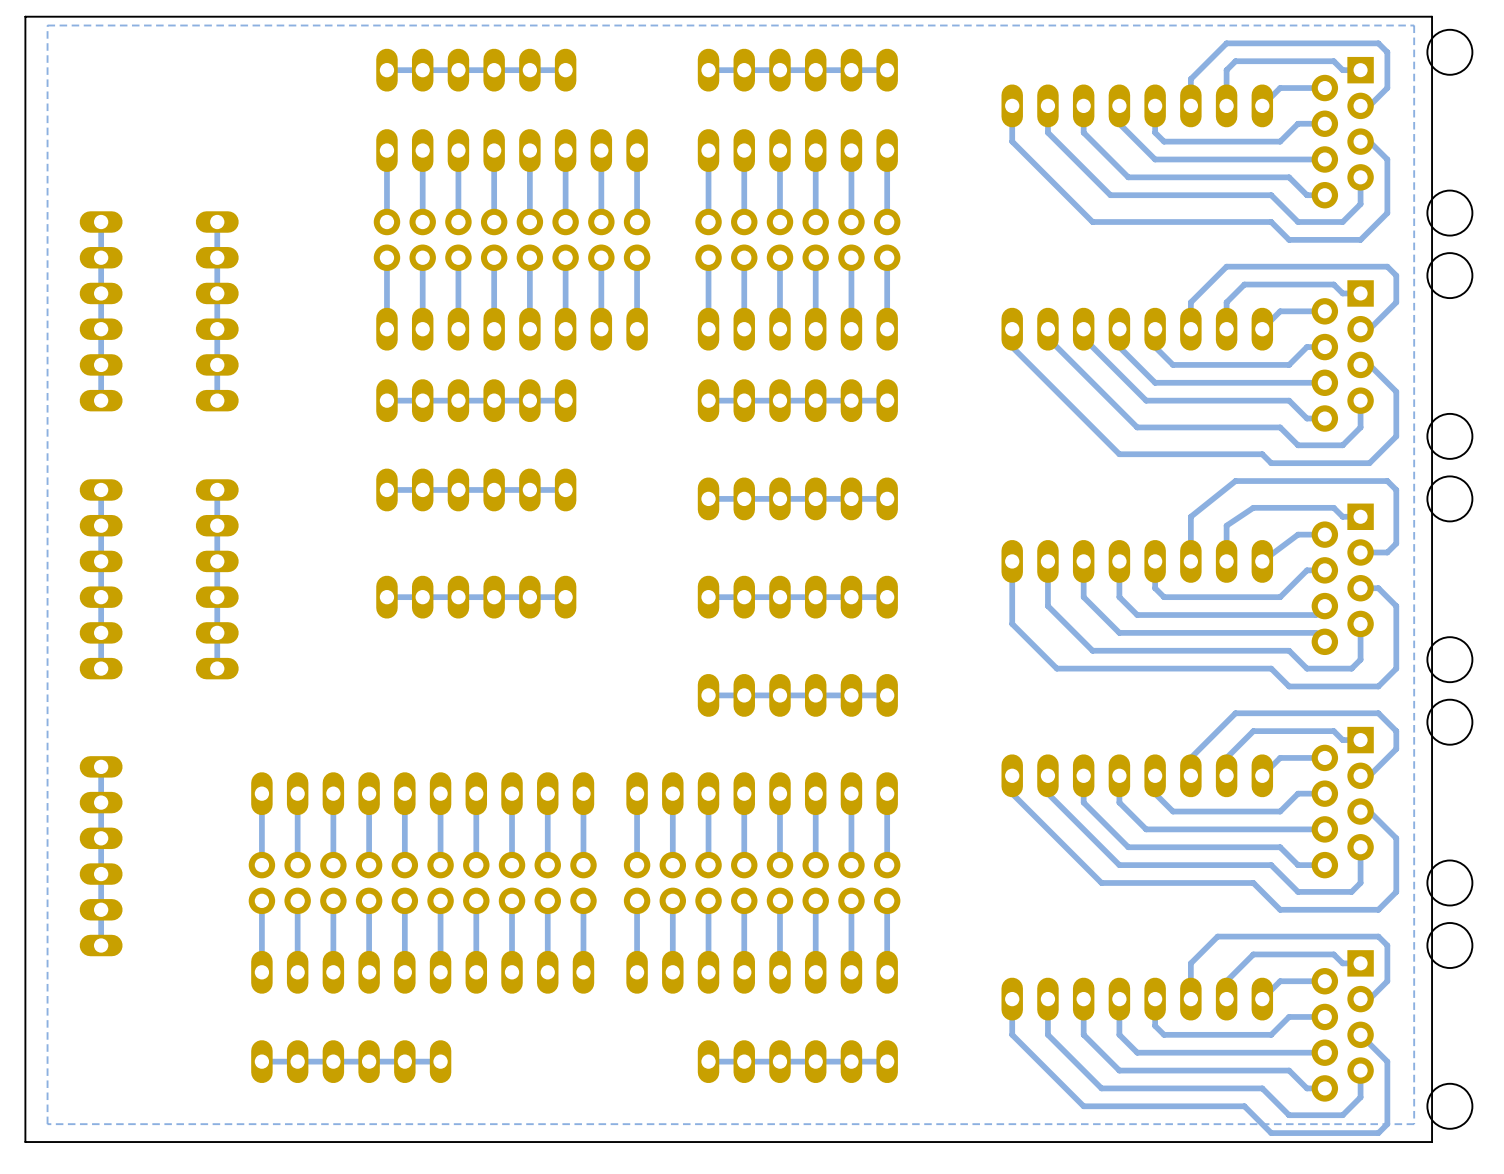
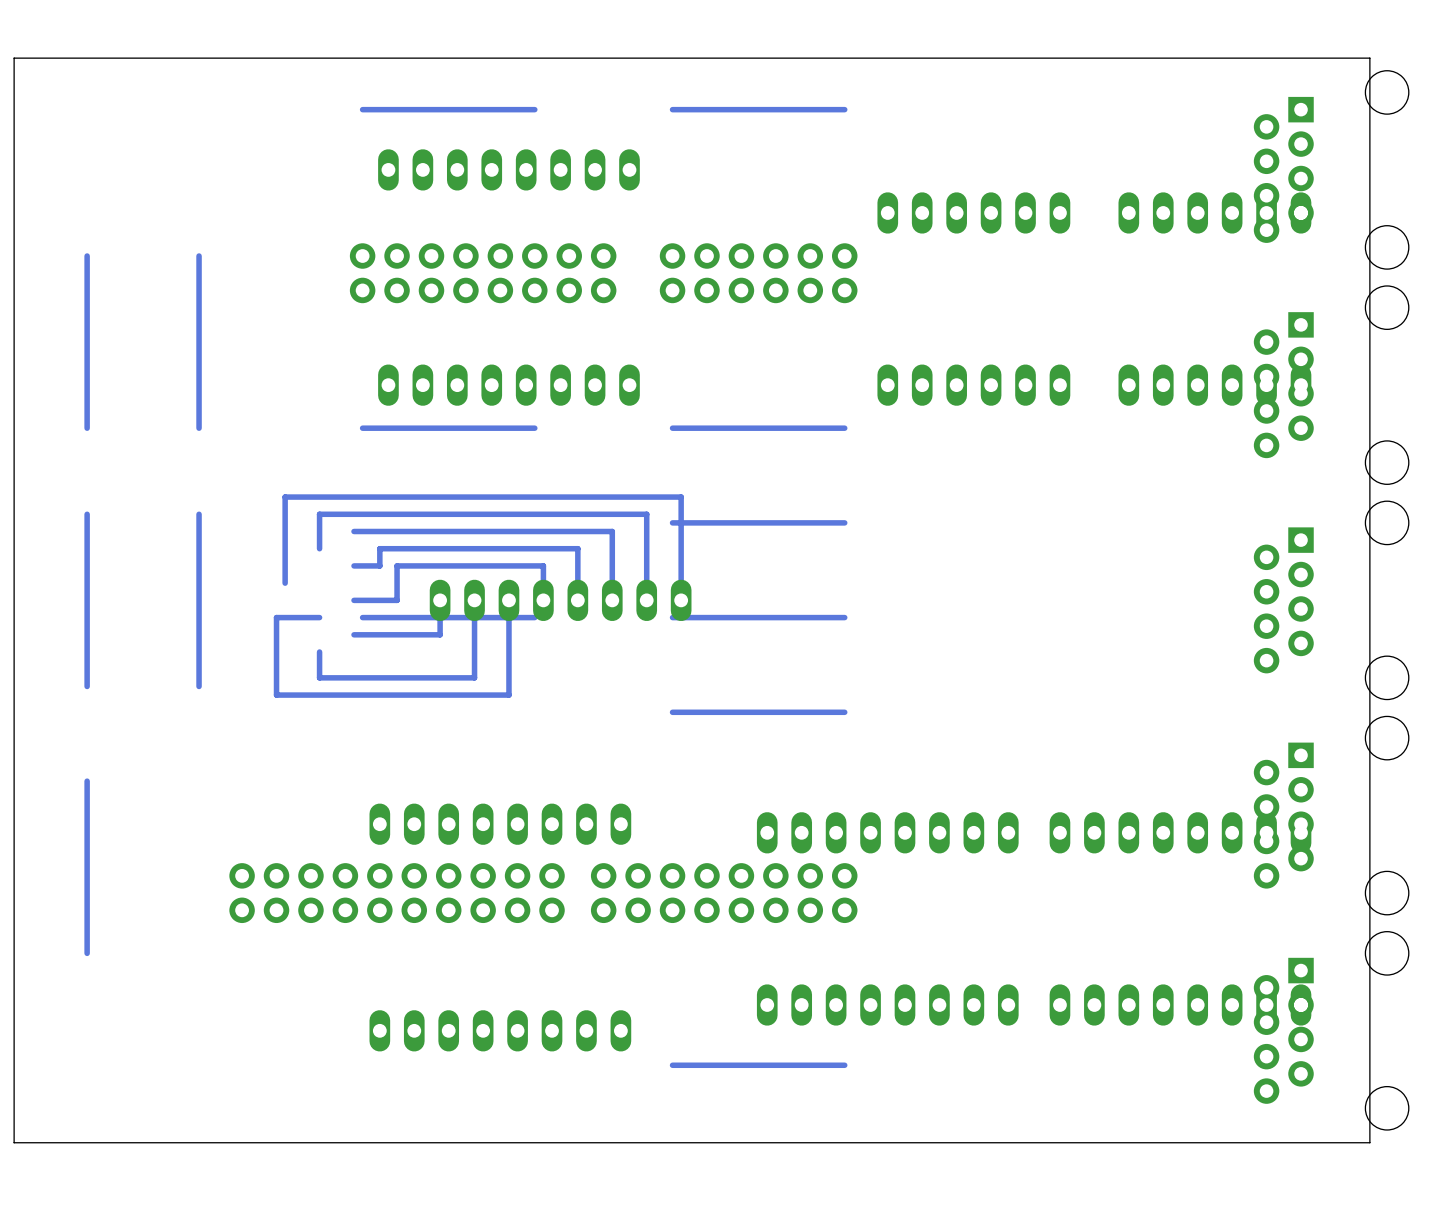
bottom zone outline: (1414, 25) (1414, 1124) (47, 1124) (47, 25) (1414, 25) -> none
part: (476, 70) -> none
part: (797, 70) -> none
bottom track: (1360, 70) (1342, 70) (1333, 61) (1235, 61) (1226, 70) (1226, 105) -> none
bottom track: (1324, 88) (1280, 88) (1262, 105) -> none
bottom track: (1012, 105) (1012, 141) (1092, 222) (1271, 222) (1289, 239) (1360, 239) (1387, 213) (1387, 159) (1369, 141) (1360, 141) -> none
bottom track: (1047, 105) (1047, 132) (1110, 195) (1271, 195) (1298, 222) (1342, 222) (1360, 204) (1360, 177) -> none
bottom track: (1083, 105) (1083, 132) (1128, 177) (1289, 177) (1306, 195) (1324, 195) -> none
bottom track: (1119, 105) (1119, 123) (1155, 159) (1324, 159) -> none
part: (1137, 105) -> none
bottom track: (1155, 105) (1155, 132) (1164, 141) (1280, 141) (1298, 123) (1324, 123) -> none
bottom track: (1360, 105) (1369, 105) (1387, 88) (1387, 52) (1378, 43) (1226, 43) (1190, 79) (1190, 105) -> none
part: none -> (508, 169)
bottom track: (386, 150) (386, 222) -> none
part: (404, 150) -> none
bottom track: (422, 150) (422, 222) -> none
bottom track: (458, 150) (458, 222) -> none
bottom track: (494, 150) (494, 222) -> none
bottom track: (529, 150) (529, 222) -> none
part: (547, 150) -> none
bottom track: (565, 150) (565, 222) -> none
bottom track: (601, 150) (601, 222) -> none
bottom track: (637, 150) (637, 222) -> none
bottom track: (708, 150) (708, 222) -> none
bottom track: (744, 150) (744, 222) -> none
bottom track: (779, 150) (779, 222) -> none
part: (797, 150) -> none
bottom track: (815, 150) (815, 222) -> none
bottom track: (851, 150) (851, 222) -> none
bottom track: (887, 150) (887, 222) -> none
part: none -> (973, 212)
part: none -> (1214, 212)
bottom track: (386, 257) (386, 329) -> none
bottom track: (422, 257) (422, 329) -> none
bottom track: (458, 257) (458, 329) -> none
bottom track: (494, 257) (494, 329) -> none
bottom track: (529, 257) (529, 329) -> none
bottom track: (565, 257) (565, 329) -> none
bottom track: (601, 257) (601, 329) -> none
bottom track: (637, 257) (637, 329) -> none
bottom track: (708, 257) (708, 329) -> none
bottom track: (744, 257) (744, 329) -> none
bottom track: (779, 257) (779, 329) -> none
bottom track: (815, 257) (815, 329) -> none
bottom track: (851, 257) (851, 329) -> none
bottom track: (887, 257) (887, 329) -> none
bottom track: (1360, 293) (1342, 293) (1333, 284) (1244, 284) (1226, 302) (1226, 329) -> none
part: (101, 311) -> none
part: (217, 311) -> none
bottom track: (1324, 311) (1280, 311) (1262, 329) -> none
part: (404, 329) -> none
part: (547, 329) -> none
part: (797, 329) -> none
bottom track: (1012, 329) (1012, 347) (1119, 454) (1262, 454) (1271, 463) (1369, 463) (1396, 436) (1396, 391) (1369, 364) (1360, 364) -> none
bottom track: (1047, 329) (1047, 338) (1137, 427) (1280, 427) (1298, 445) (1342, 445) (1360, 427) (1360, 400) -> none
bottom track: (1083, 329) (1083, 338) (1146, 400) (1289, 400) (1306, 418) (1324, 418) -> none
bottom track: (1119, 329) (1119, 347) (1155, 382) (1324, 382) -> none
part: (1137, 329) -> none
bottom track: (1155, 329) (1155, 347) (1173, 364) (1289, 364) (1306, 347) (1324, 347) -> none
bottom track: (1360, 329) (1369, 329) (1396, 302) (1396, 275) (1387, 266) (1226, 266) (1190, 302) (1190, 329) -> none
part: none -> (508, 385)
part: none -> (973, 385)
part: none -> (1214, 385)
part: (476, 400) -> none
part: (797, 400) -> none
bottom track: none -> (362, 514) (319, 514) (319, 548)
part: (476, 489) -> none
bottom track: none -> (534, 514) (646, 514) (646, 600)
part: (797, 498) -> none
bottom track: none -> (354, 531) (612, 531) (612, 600)
bottom track: (1360, 516) (1342, 516) (1333, 507) (1253, 507) (1226, 525) (1226, 561) -> none
bottom track: (1324, 534) (1298, 534) (1262, 561) -> none
bottom track: none -> (354, 565) (379, 565) (379, 548) (577, 548) (577, 600)
bottom track: (1360, 552) (1387, 552) (1396, 543) (1396, 489) (1387, 481) (1235, 481) (1190, 516) (1190, 561) -> none
bottom track: none -> (285, 583) (285, 497) (681, 497) (681, 600)
bottom track: (1012, 561) (1012, 623) (1056, 668) (1271, 668) (1289, 686) (1378, 686) (1396, 668) (1396, 606) (1378, 588) (1360, 588) -> none
bottom track: (1047, 561) (1047, 606) (1092, 650) (1289, 650) (1306, 668) (1351, 668) (1360, 659) (1360, 623) -> none
bottom track: (1083, 561) (1083, 597) (1119, 632) (1315, 632) (1324, 641) -> none
bottom track: (1119, 561) (1119, 597) (1137, 615) (1315, 615) (1324, 606) -> none
part: (1137, 561) -> none
bottom track: (1155, 561) (1155, 588) (1164, 597) (1280, 597) (1306, 570) (1324, 570) -> none
part: (101, 579) -> none
part: (217, 579) -> none
bottom track: none -> (440, 600) (440, 634) (354, 634)
bottom track: none -> (474, 600) (474, 677) (319, 677) (319, 652)
bottom track: none -> (508, 600) (508, 695) (276, 695) (276, 617) (319, 617)
bottom track: none -> (543, 600) (543, 565) (397, 565) (397, 600) (354, 600)
part: none -> (560, 600)
part: (476, 597) -> none
part: (797, 597) -> none
part: (797, 695) -> none
bottom track: (1360, 740) (1342, 740) (1333, 731) (1253, 731) (1226, 757) (1226, 775) -> none
bottom track: (1324, 757) (1280, 757) (1262, 775) -> none
bottom track: (1012, 775) (1012, 793) (1101, 882) (1253, 882) (1280, 909) (1378, 909) (1396, 891) (1396, 838) (1369, 811) (1360, 811) -> none
bottom track: (1047, 775) (1047, 793) (1119, 865) (1271, 865) (1298, 891) (1351, 891) (1360, 882) (1360, 847) -> none
bottom track: (1083, 775) (1083, 802) (1128, 847) (1280, 847) (1298, 865) (1324, 865) -> none
bottom track: (1119, 775) (1119, 802) (1146, 829) (1324, 829) -> none
part: (1137, 775) -> none
bottom track: (1155, 775) (1155, 793) (1173, 811) (1280, 811) (1298, 793) (1324, 793) -> none
bottom track: (1360, 775) (1369, 775) (1396, 749) (1396, 731) (1378, 713) (1235, 713) (1190, 757) (1190, 775) -> none
bottom track: (261, 793) (261, 865) -> none
part: (279, 793) -> none
bottom track: (297, 793) (297, 865) -> none
bottom track: (333, 793) (333, 865) -> none
bottom track: (369, 793) (369, 865) -> none
bottom track: (404, 793) (404, 865) -> none
bottom track: (440, 793) (440, 865) -> none
part position: (458, 793) -> (500, 824)
bottom track: (476, 793) (476, 865) -> none
bottom track: (512, 793) (512, 865) -> none
bottom track: (547, 793) (547, 865) -> none
bottom track: (583, 793) (583, 865) -> none
bottom track: (637, 793) (637, 865) -> none
bottom track: (672, 793) (672, 865) -> none
bottom track: (708, 793) (708, 865) -> none
bottom track: (744, 793) (744, 865) -> none
part: (762, 793) -> none
bottom track: (779, 793) (779, 865) -> none
bottom track: (815, 793) (815, 865) -> none
bottom track: (851, 793) (851, 865) -> none
bottom track: (887, 793) (887, 865) -> none
part: none -> (887, 832)
part: none -> (1180, 832)
part: (101, 856) -> none
bottom track: (261, 900) (261, 972) -> none
bottom track: (297, 900) (297, 972) -> none
bottom track: (333, 900) (333, 972) -> none
bottom track: (369, 900) (369, 972) -> none
bottom track: (404, 900) (404, 972) -> none
bottom track: (440, 900) (440, 972) -> none
bottom track: (476, 900) (476, 972) -> none
bottom track: (512, 900) (512, 972) -> none
bottom track: (547, 900) (547, 972) -> none
bottom track: (583, 900) (583, 972) -> none
bottom track: (637, 900) (637, 972) -> none
bottom track: (672, 900) (672, 972) -> none
bottom track: (708, 900) (708, 972) -> none
bottom track: (744, 900) (744, 972) -> none
bottom track: (779, 900) (779, 972) -> none
bottom track: (815, 900) (815, 972) -> none
bottom track: (851, 900) (851, 972) -> none
bottom track: (887, 900) (887, 972) -> none
bottom track: (1360, 963) (1342, 963) (1333, 954) (1253, 954) (1226, 981) (1226, 999) -> none
part: (279, 972) -> none
part: (458, 972) -> none
part: (762, 972) -> none
bottom track: (1324, 981) (1280, 981) (1262, 999) -> none
part: none -> (887, 1005)
bottom track: (1012, 999) (1012, 1034) (1083, 1106) (1244, 1106) (1271, 1133) (1378, 1133) (1387, 1124) (1387, 1061) (1360, 1034) -> none
bottom track: (1047, 999) (1047, 1034) (1101, 1088) (1262, 1088) (1289, 1115) (1342, 1115) (1360, 1097) (1360, 1070) -> none
bottom track: (1083, 999) (1083, 1034) (1119, 1070) (1289, 1070) (1306, 1088) (1324, 1088) -> none
bottom track: (1119, 999) (1119, 1034) (1137, 1052) (1324, 1052) -> none
part position: (1137, 999) -> (1180, 1005)
bottom track: (1155, 999) (1155, 1025) (1164, 1034) (1271, 1034) (1289, 1016) (1324, 1016) -> none
bottom track: (1360, 999) (1369, 999) (1387, 981) (1387, 945) (1378, 936) (1217, 936) (1190, 963) (1190, 999) -> none
part: none -> (500, 1030)
part: (351, 1061) -> none
bottom track: (440, 1061) (261, 1061) -> none
part: (797, 1061) -> none

